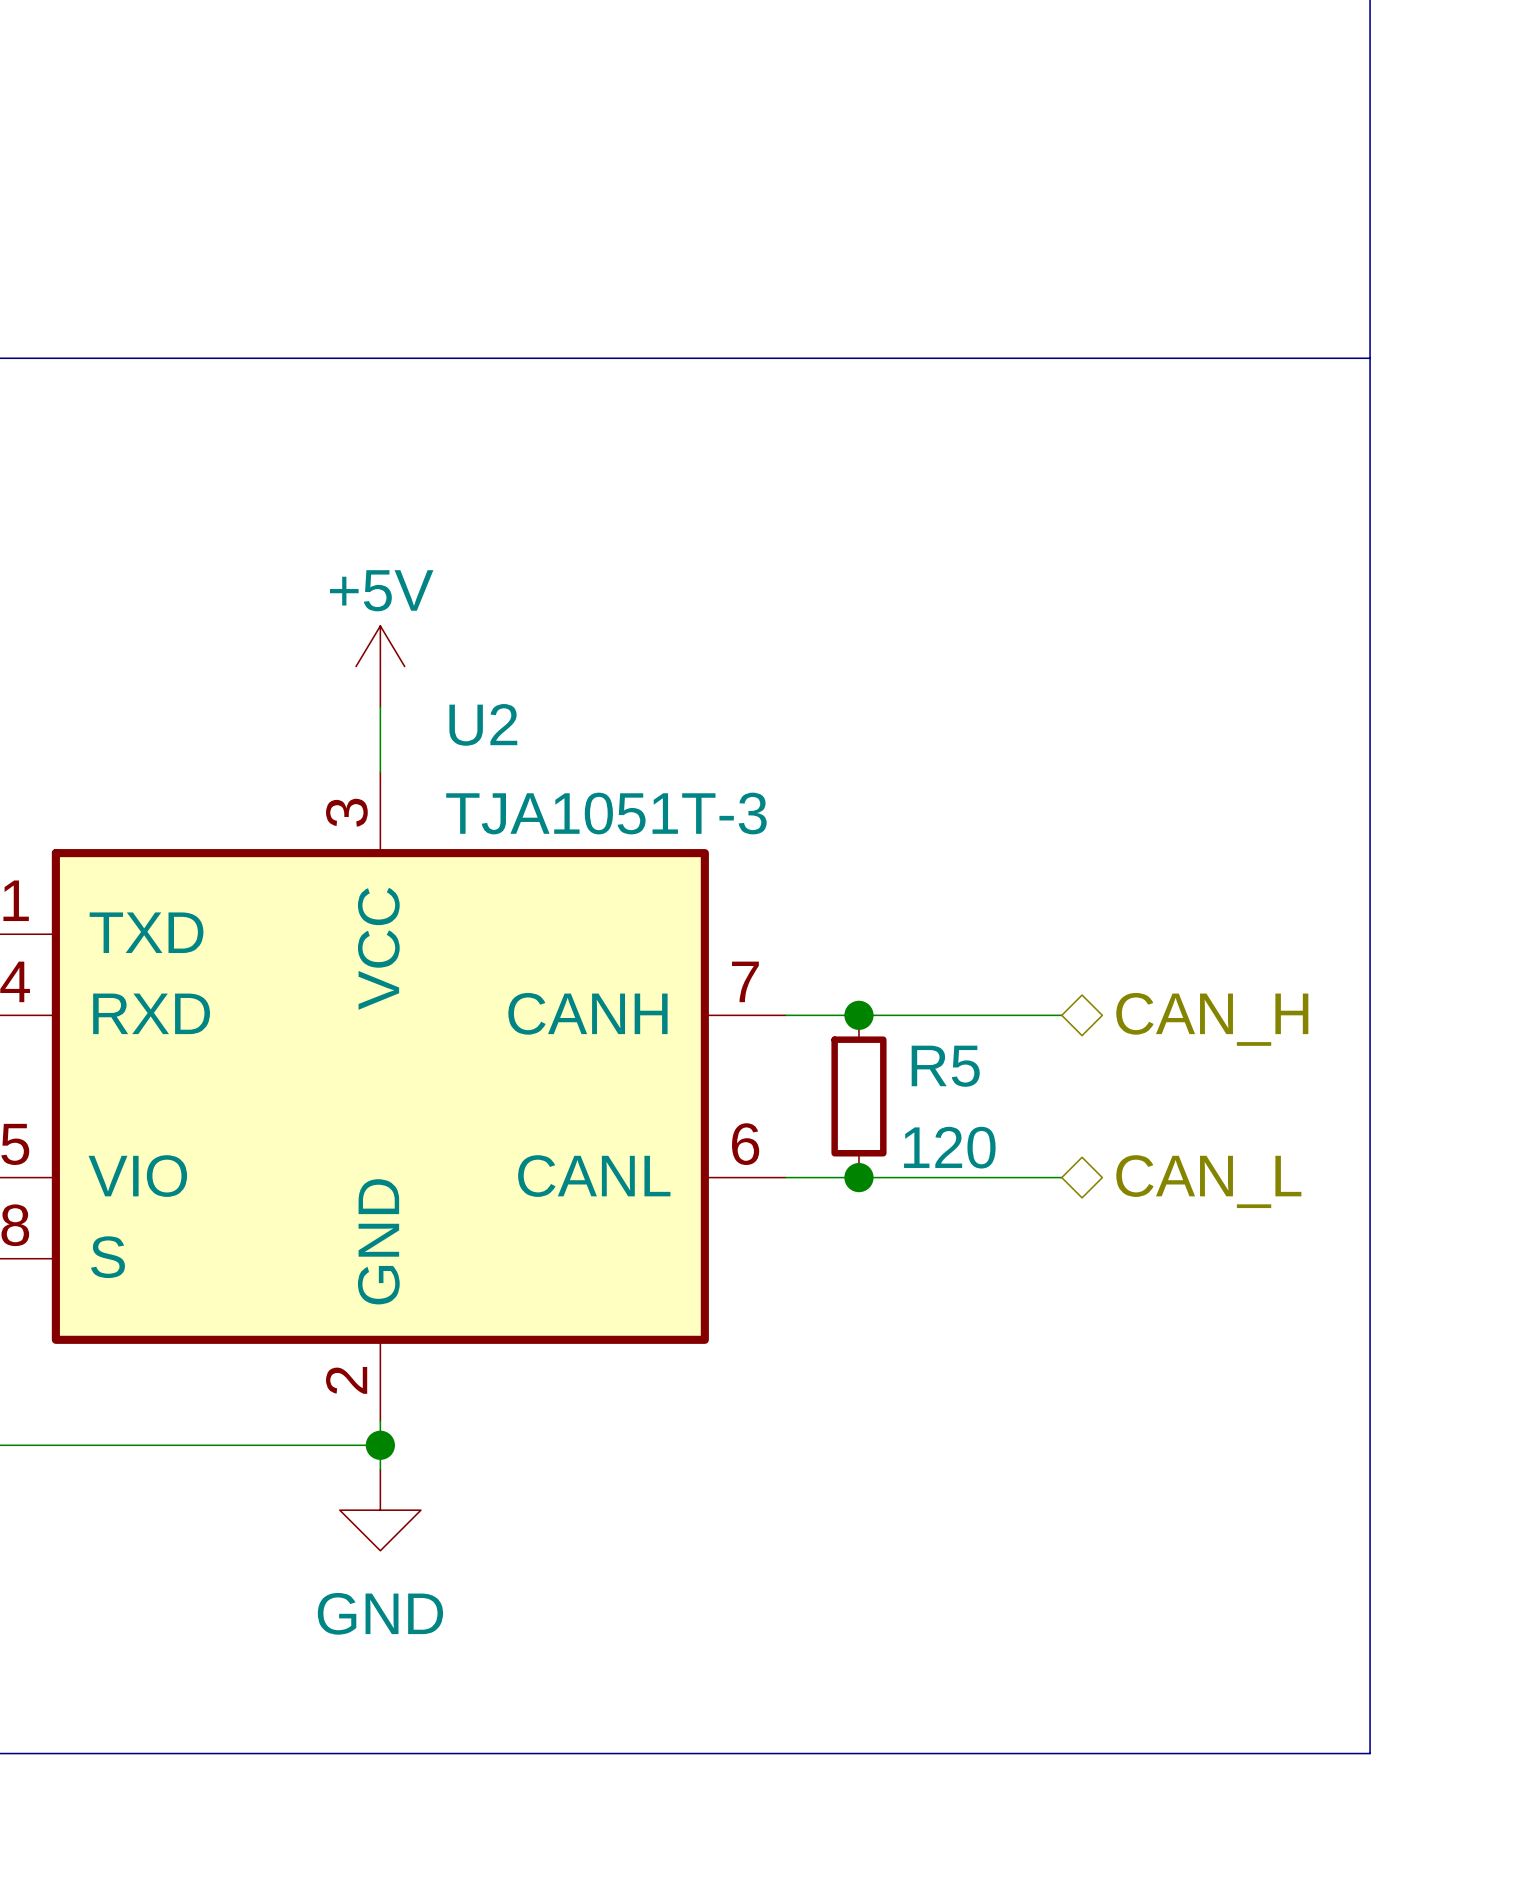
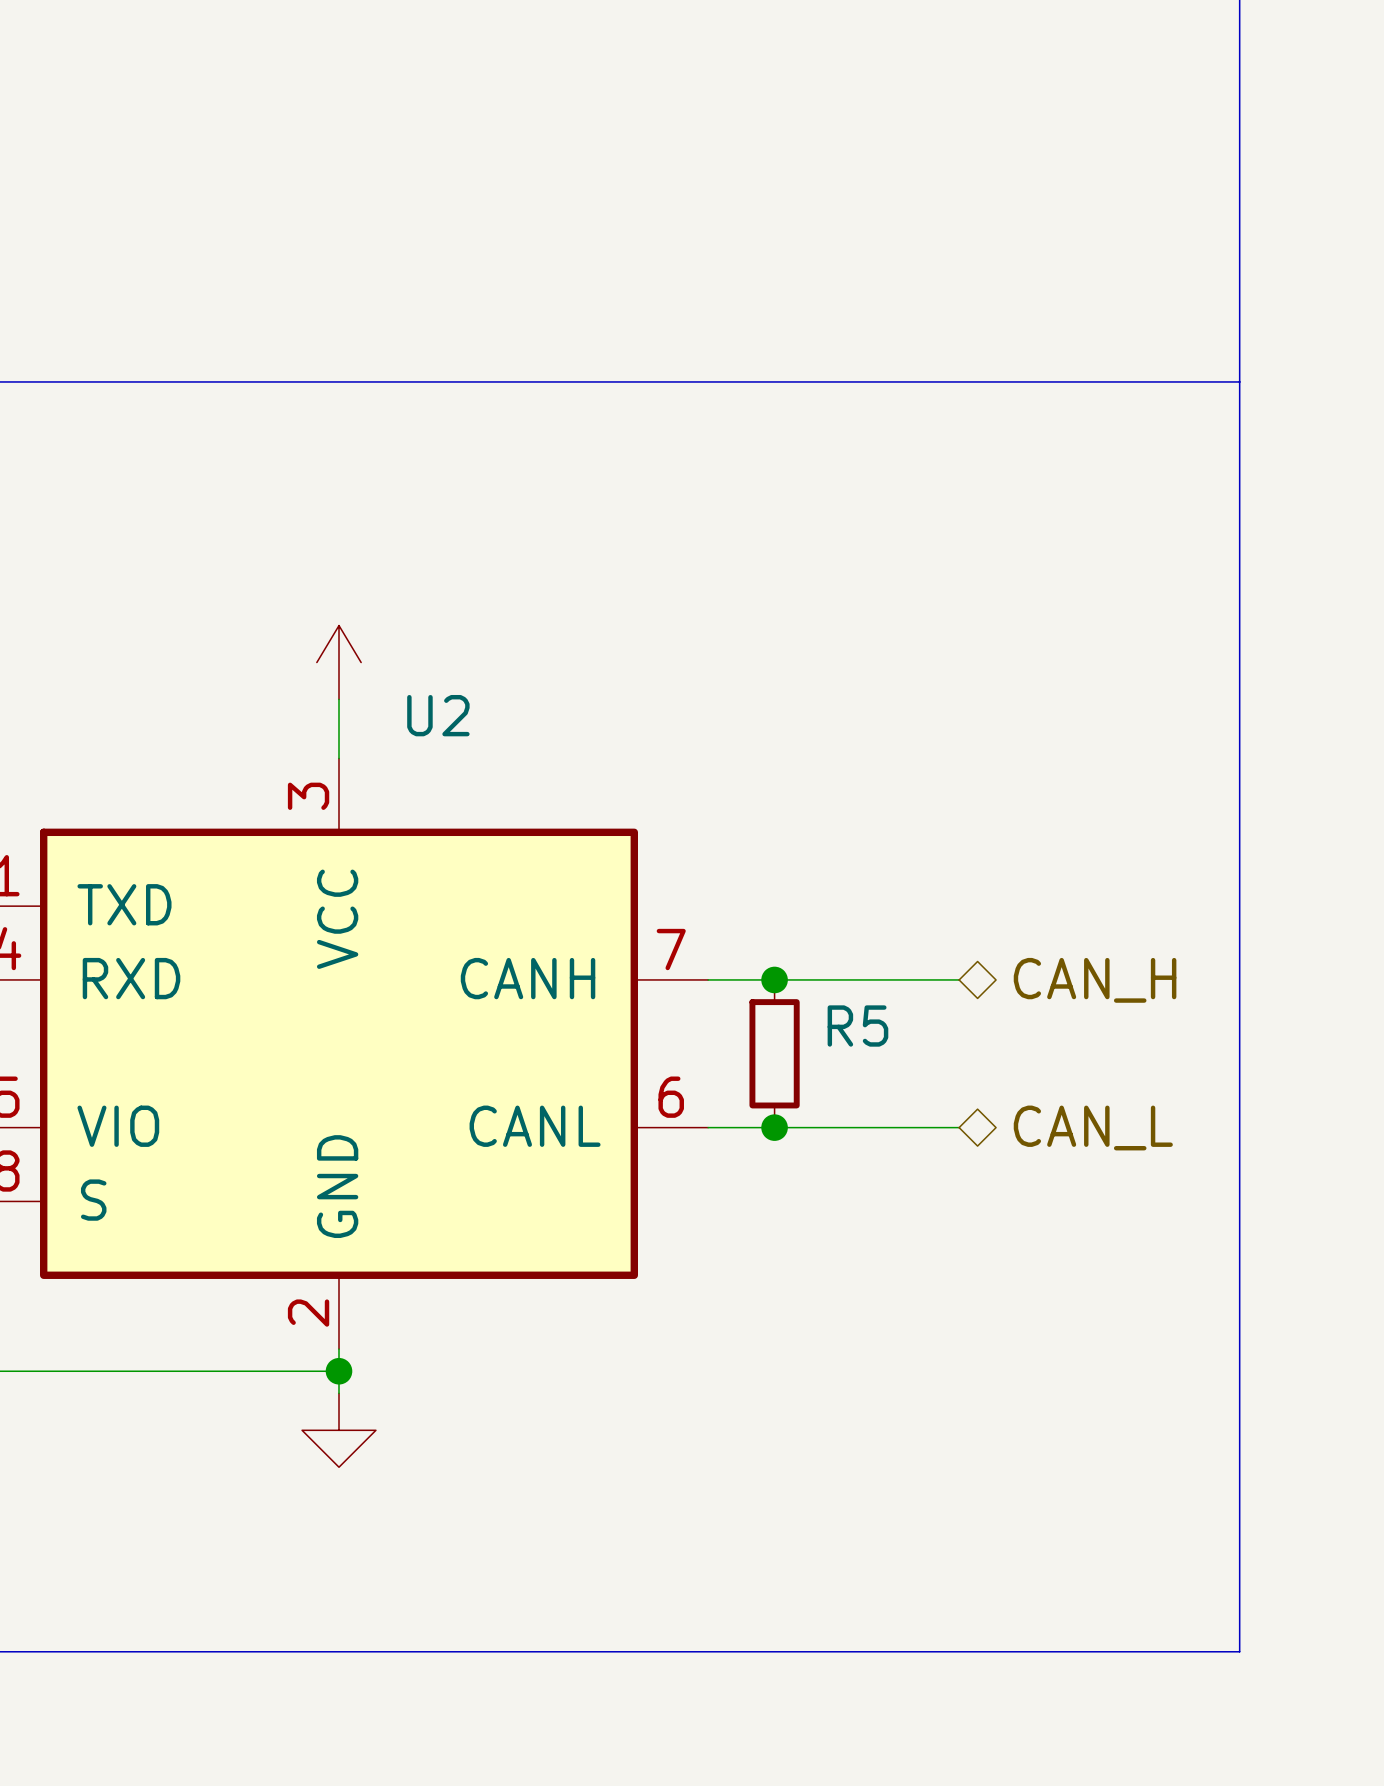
power symbol text: +5V (381, 590) -> none
U2 value: TJA1051T-3 (606, 813) -> none
R5 value: 120 (949, 1147) -> none
power symbol text: GND (380, 1613) -> none

